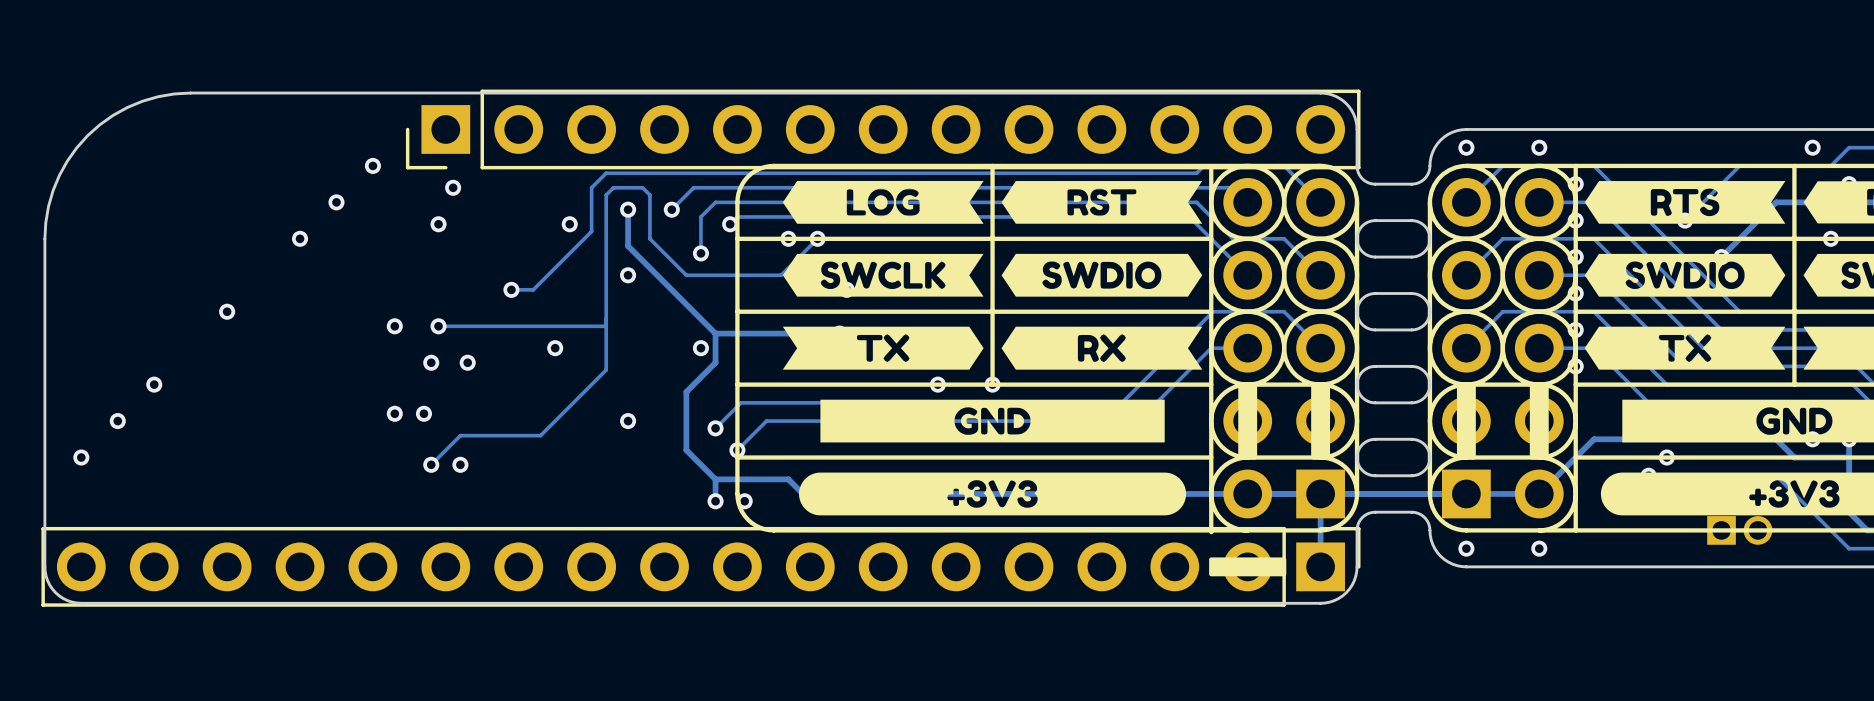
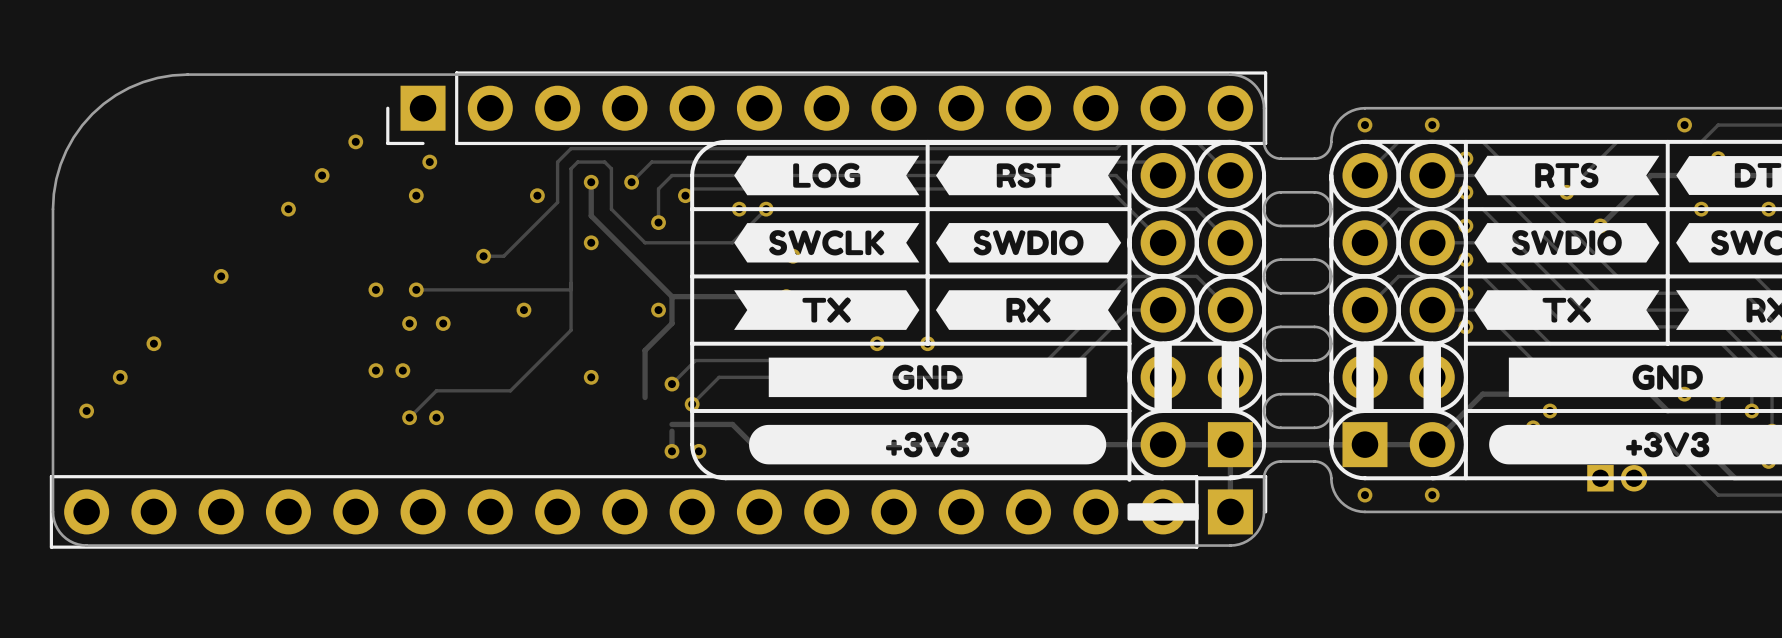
track: (686, 442) (686, 450) (715, 479) (788, 479) -> (671, 424) (732, 424) (739, 431)

